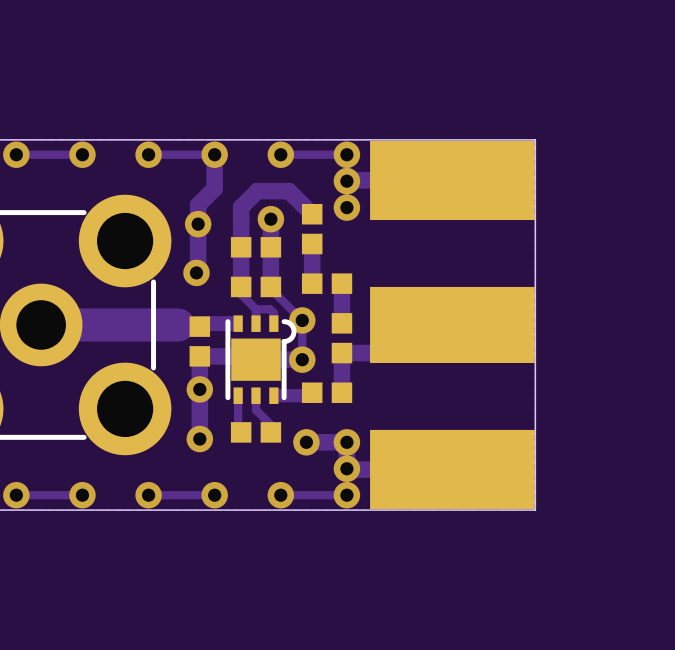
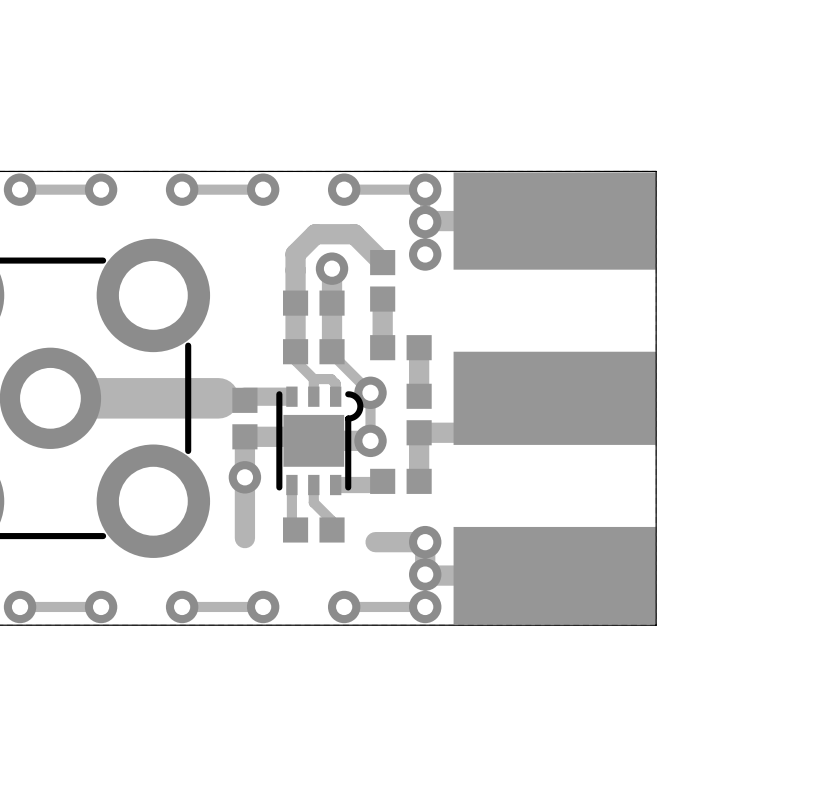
track: (214, 154) (214, 188) (198, 205) (198, 271) (196, 272) -> none
via: (198, 224) -> none
via: (196, 272) -> none
via: (199, 439) -> none
via: (306, 442) -> none

